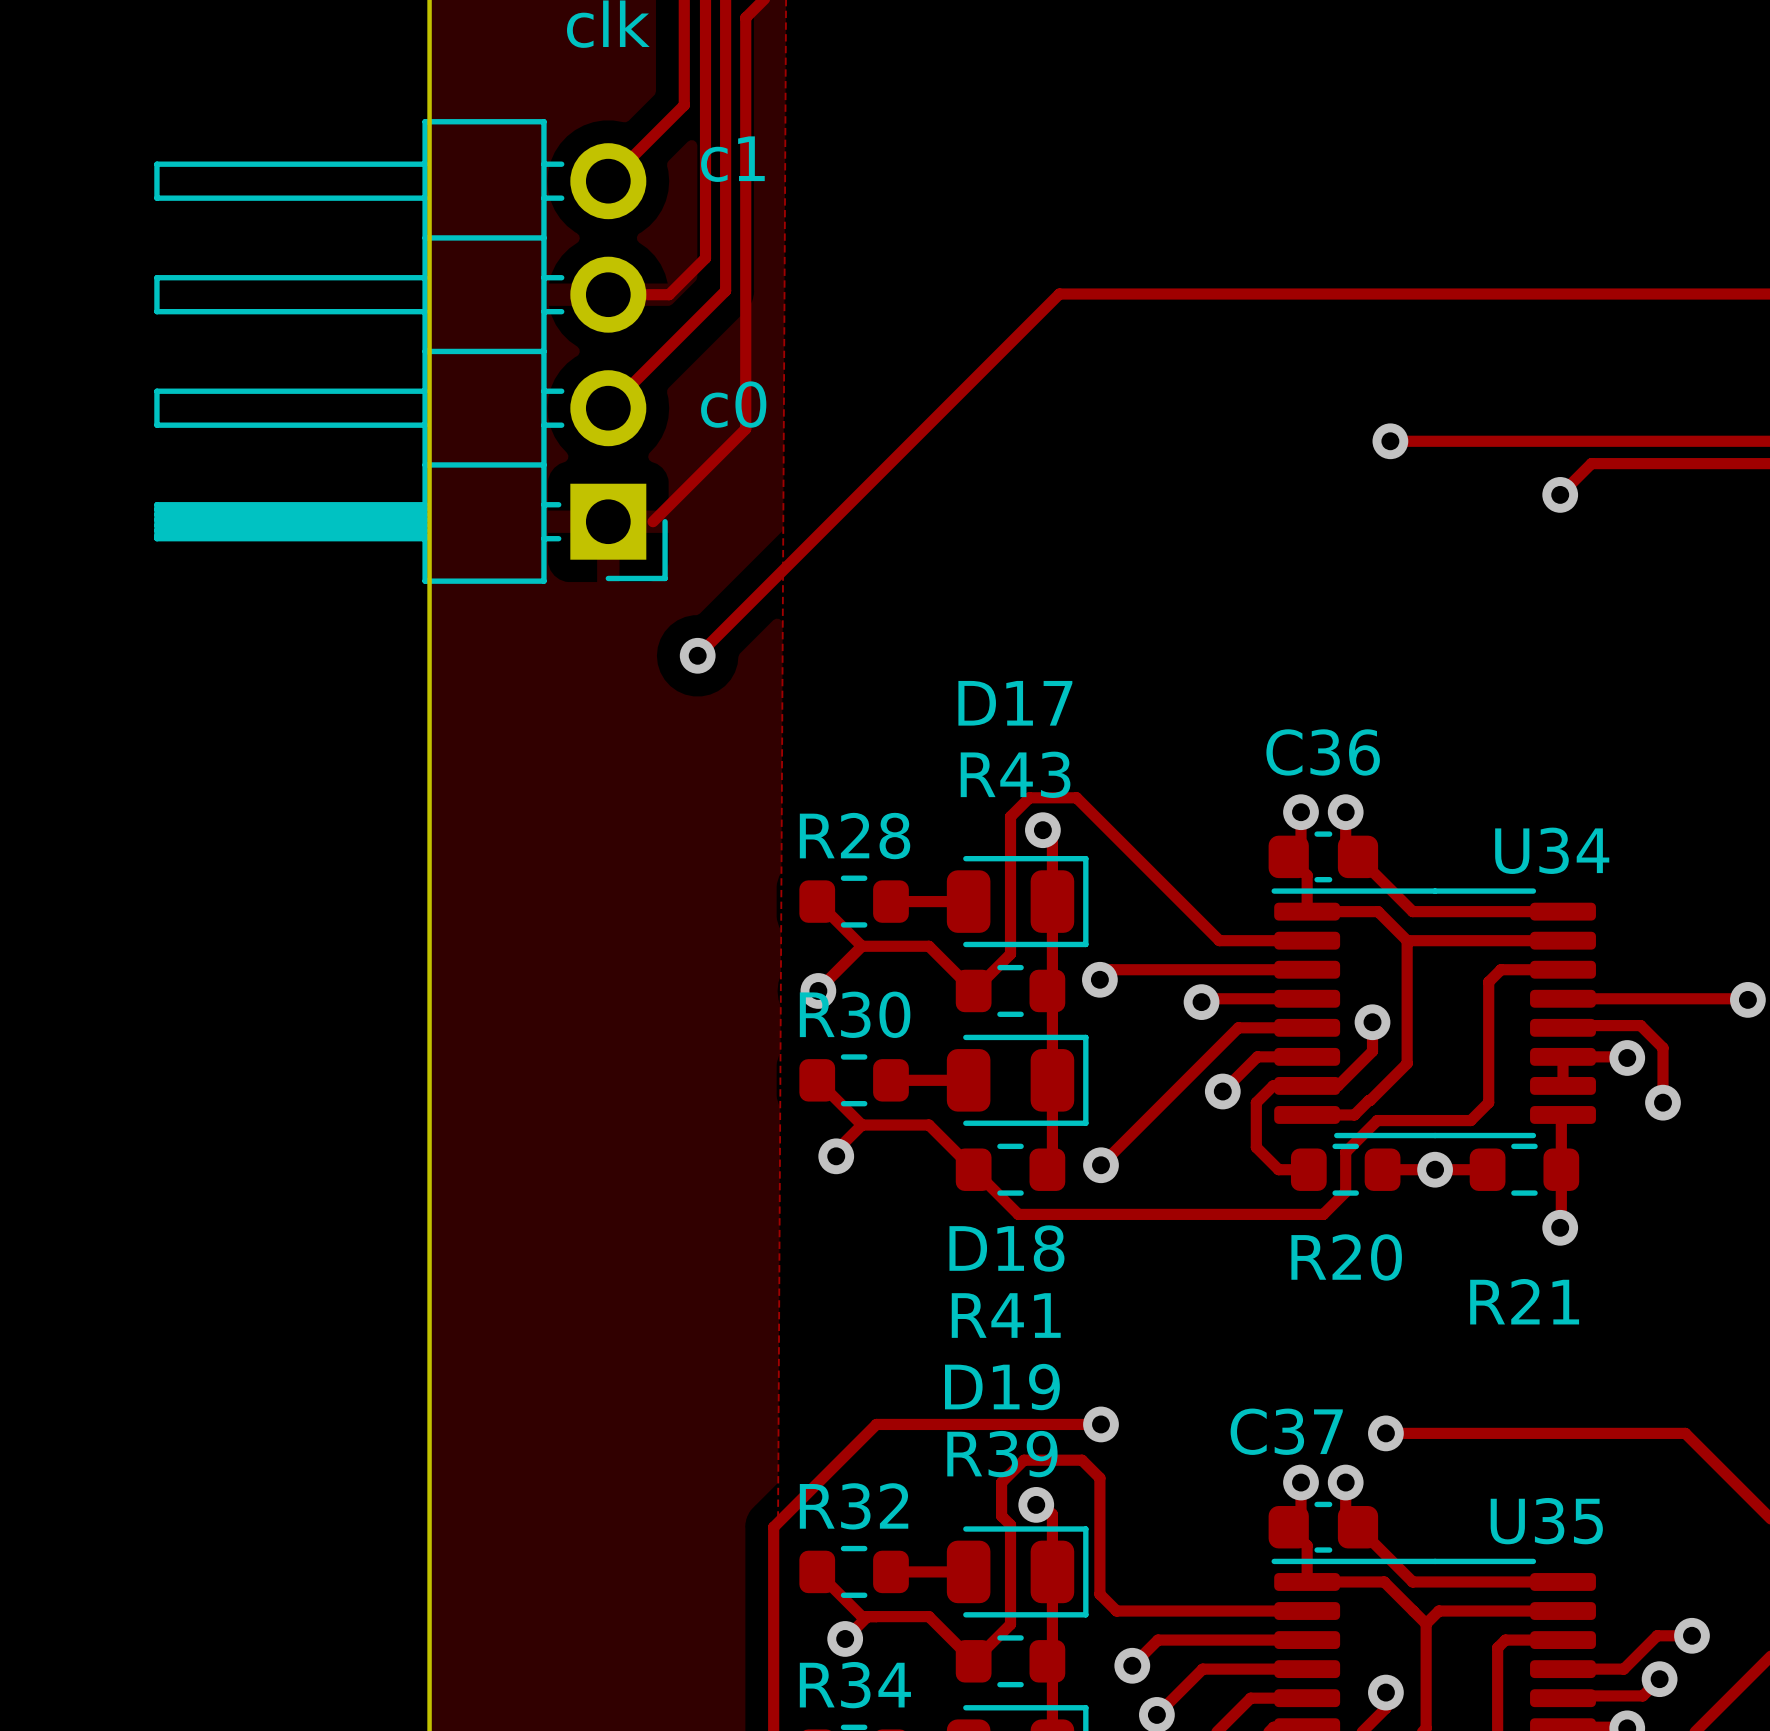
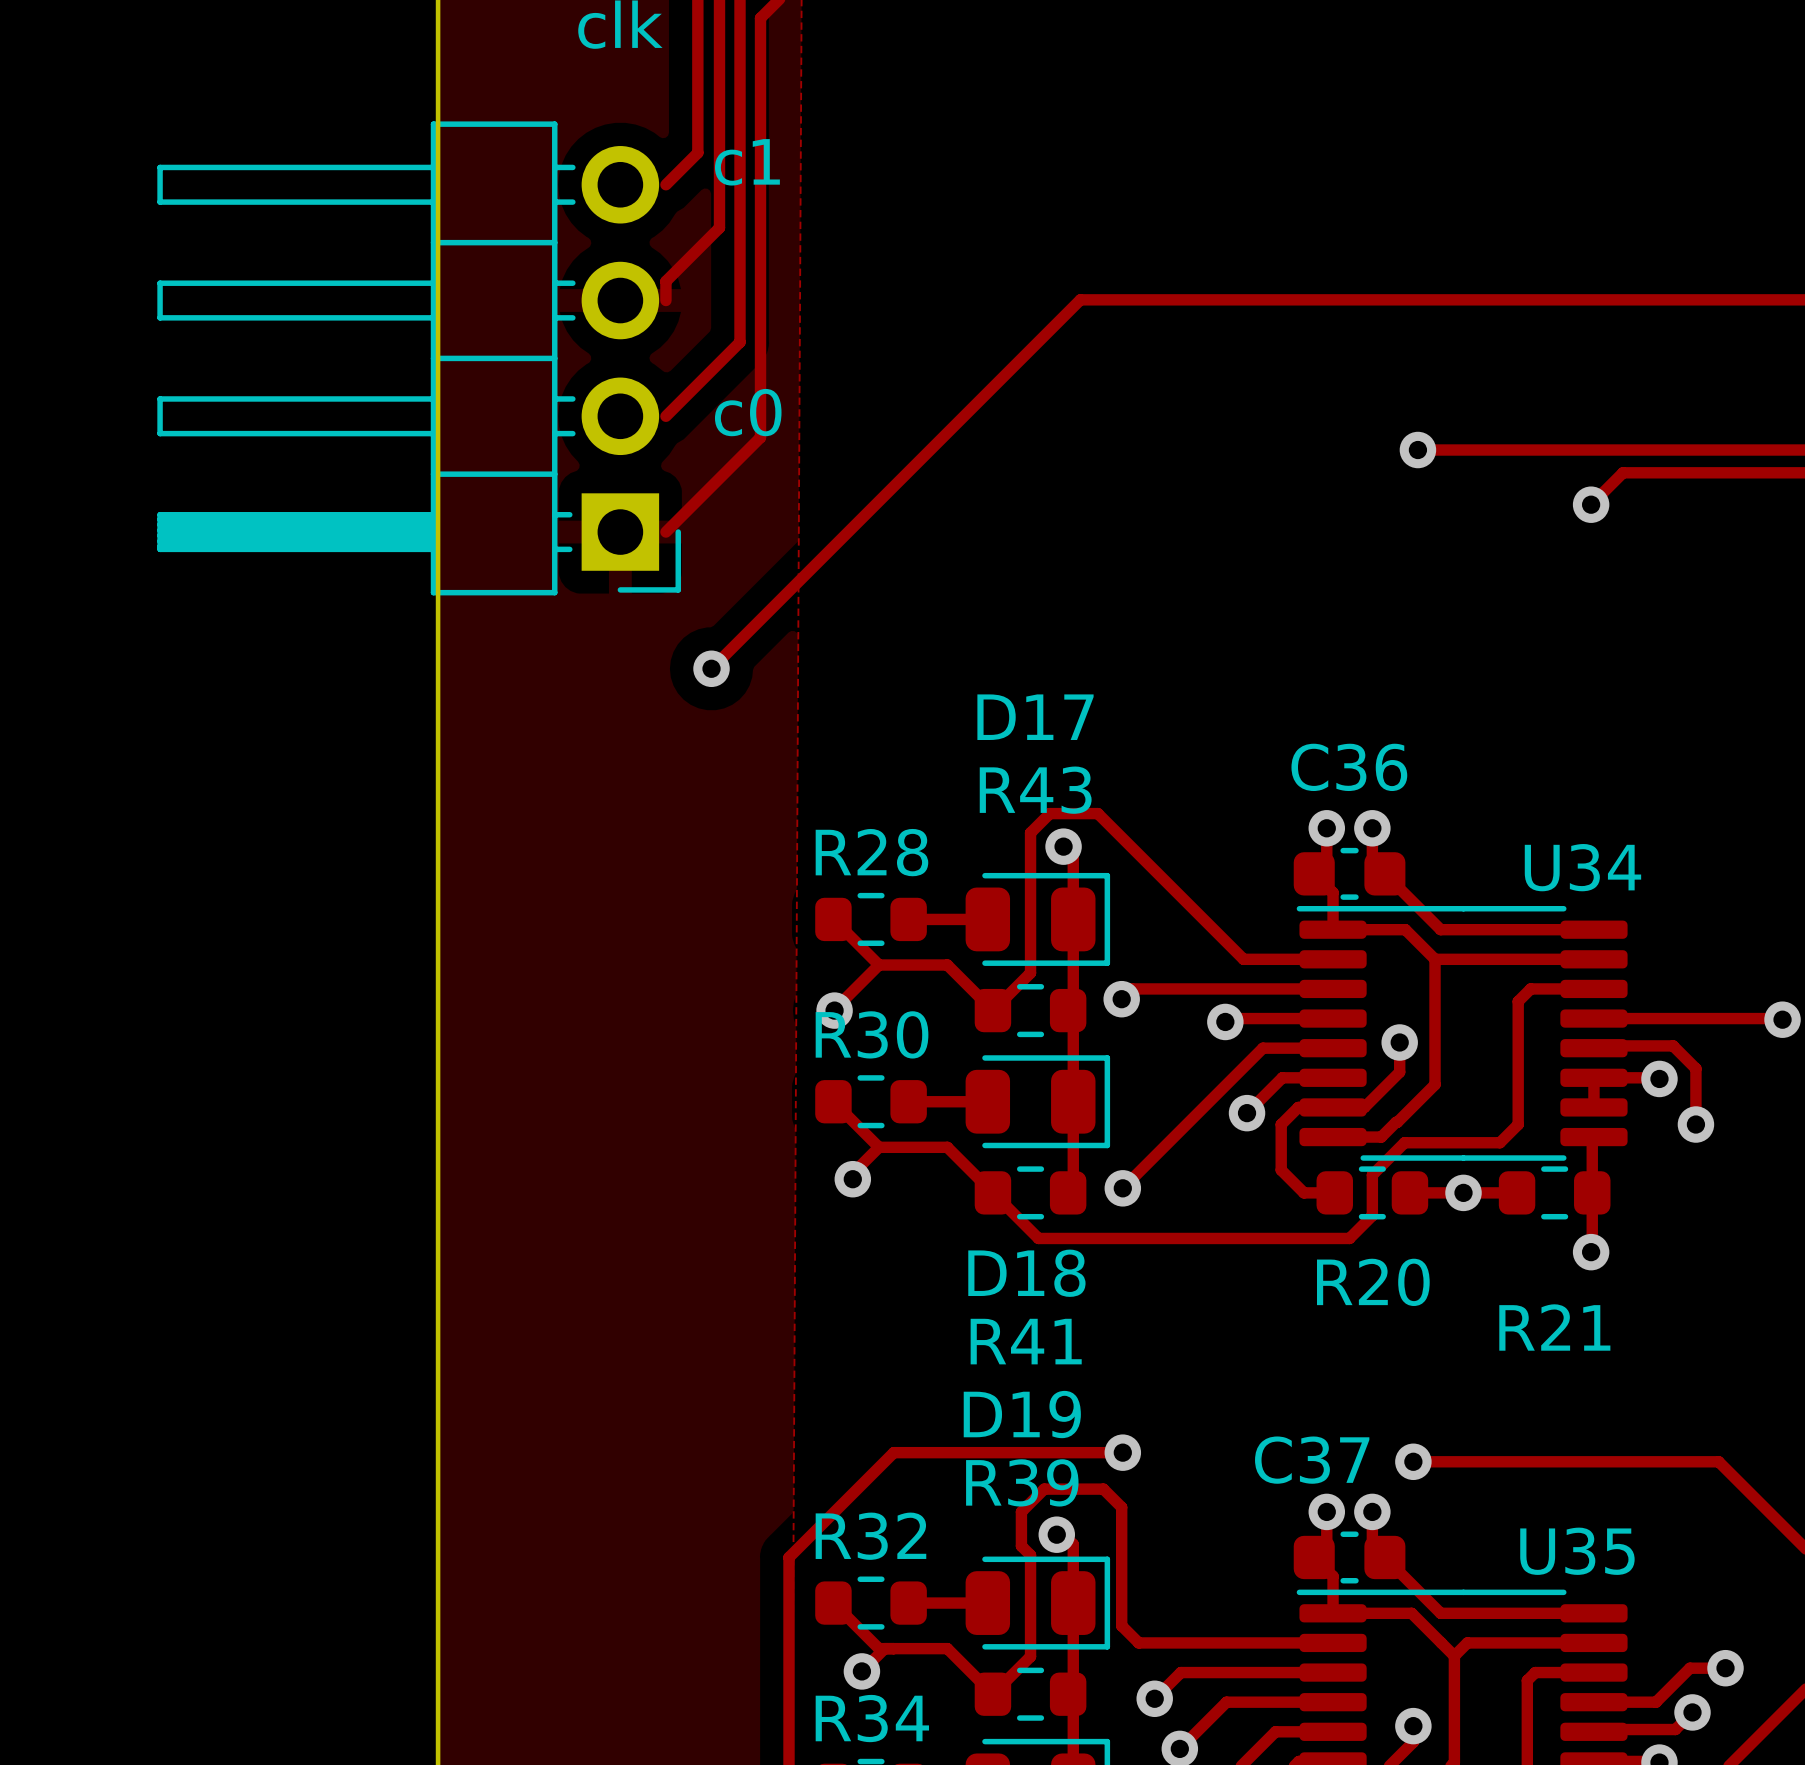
track: (684, 105) (608, 181) -> (697, 107) (697, 152) (665, 184)
track: (705, 223) (705, 258) (669, 294) (608, 294) -> (719, 227) (665, 281) (665, 300)
track: (725, 290) (608, 408) -> (740, 296) (740, 342) (665, 416)

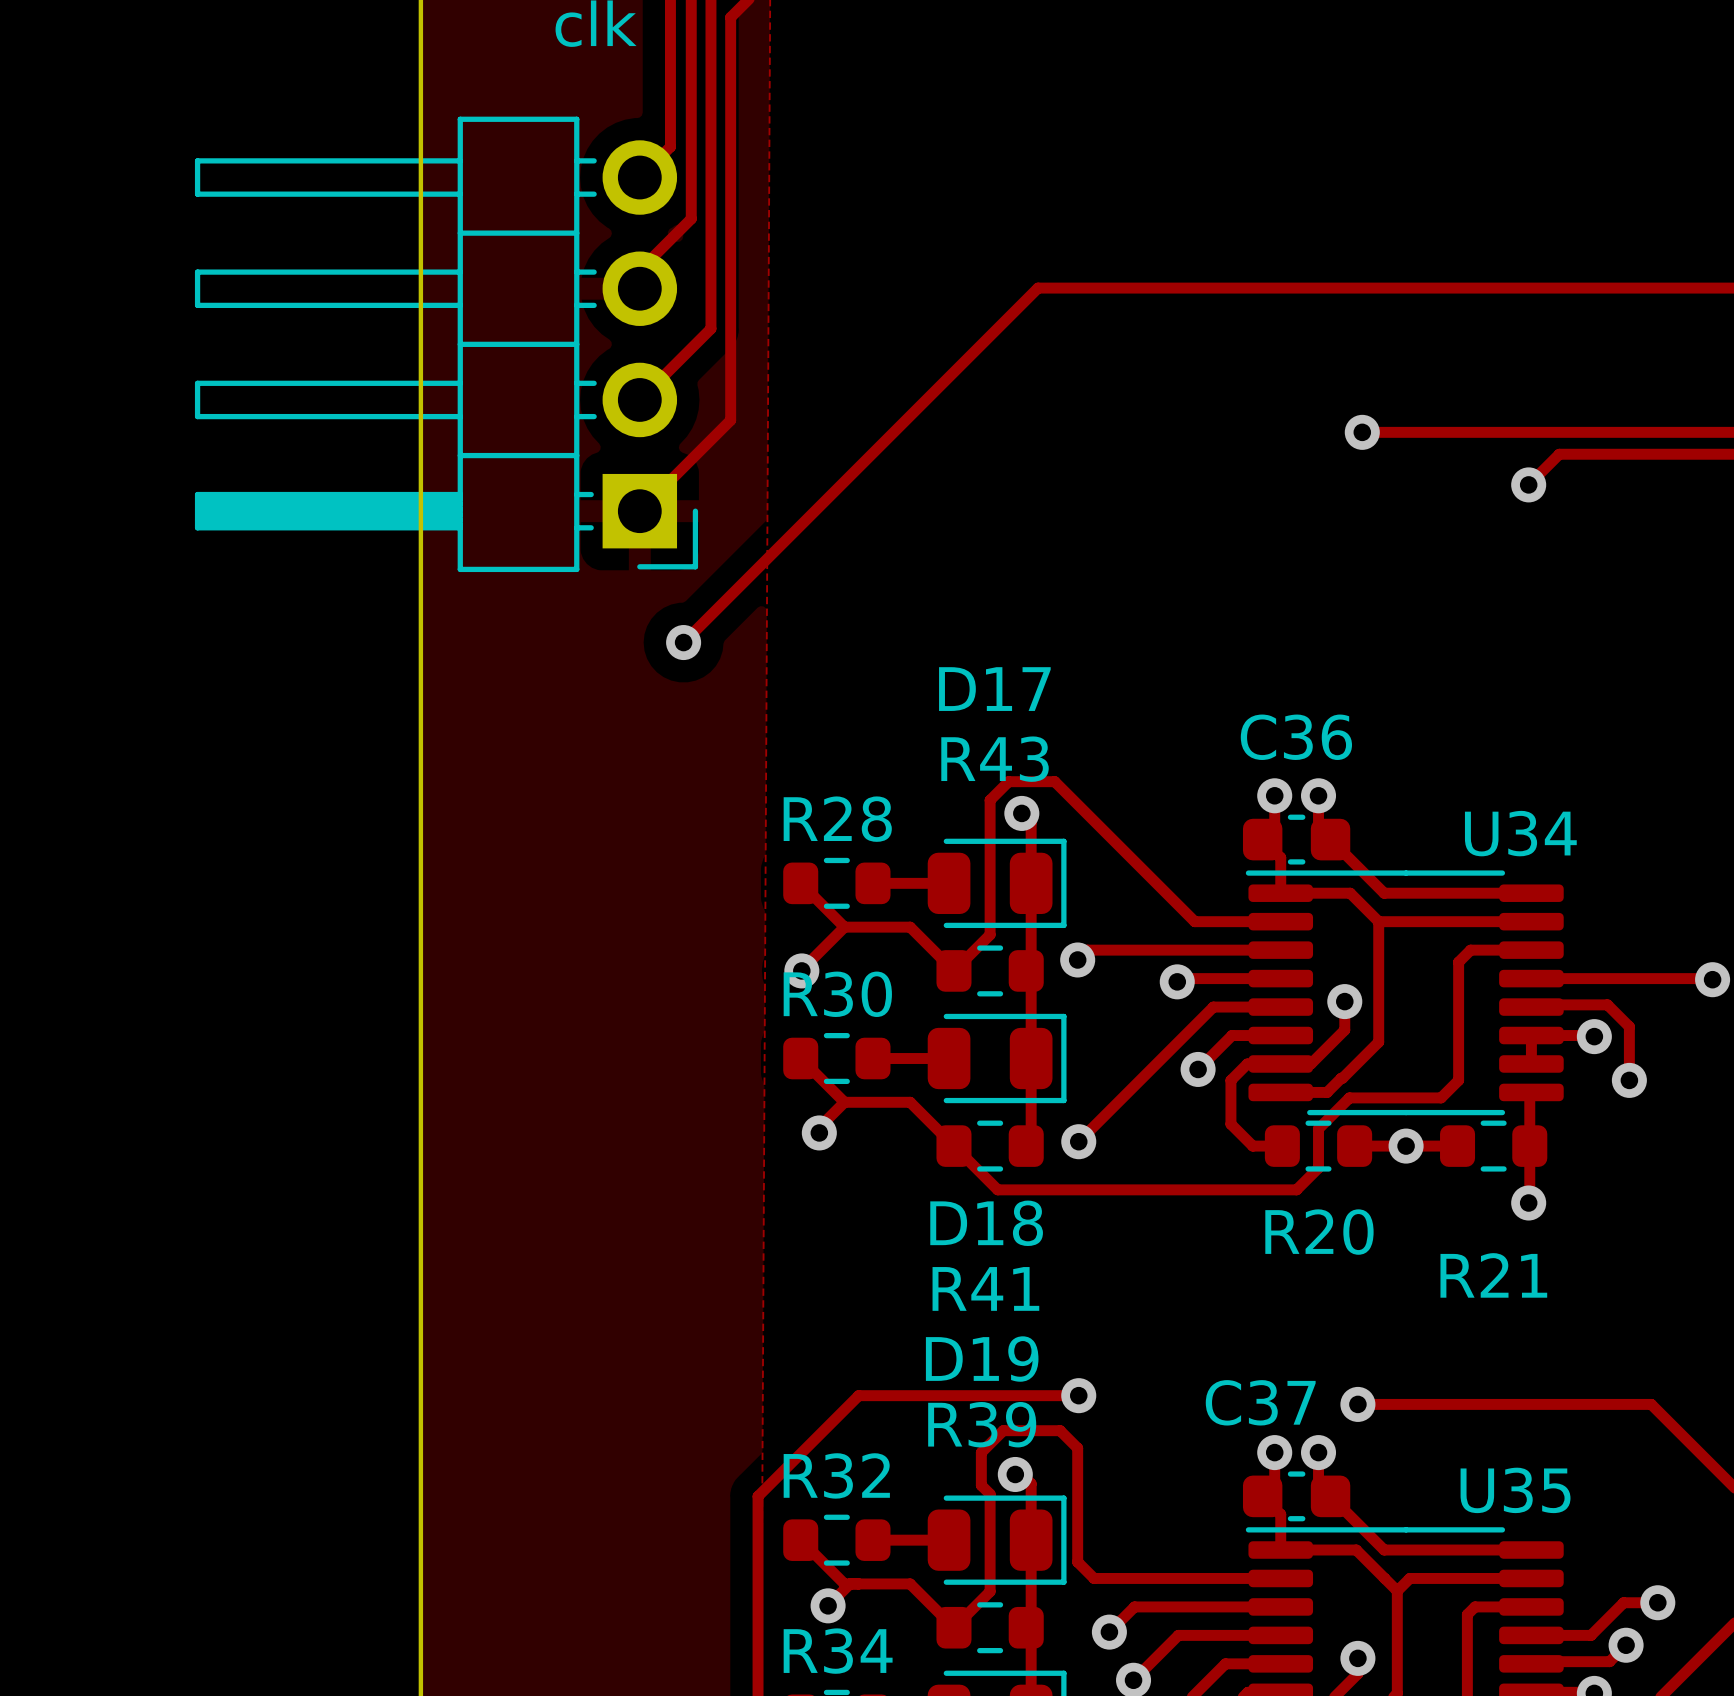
text: c1 (747, 162) -> none
part position: (419, 358) -> (446, 344)
text: c0 (748, 412) -> none

